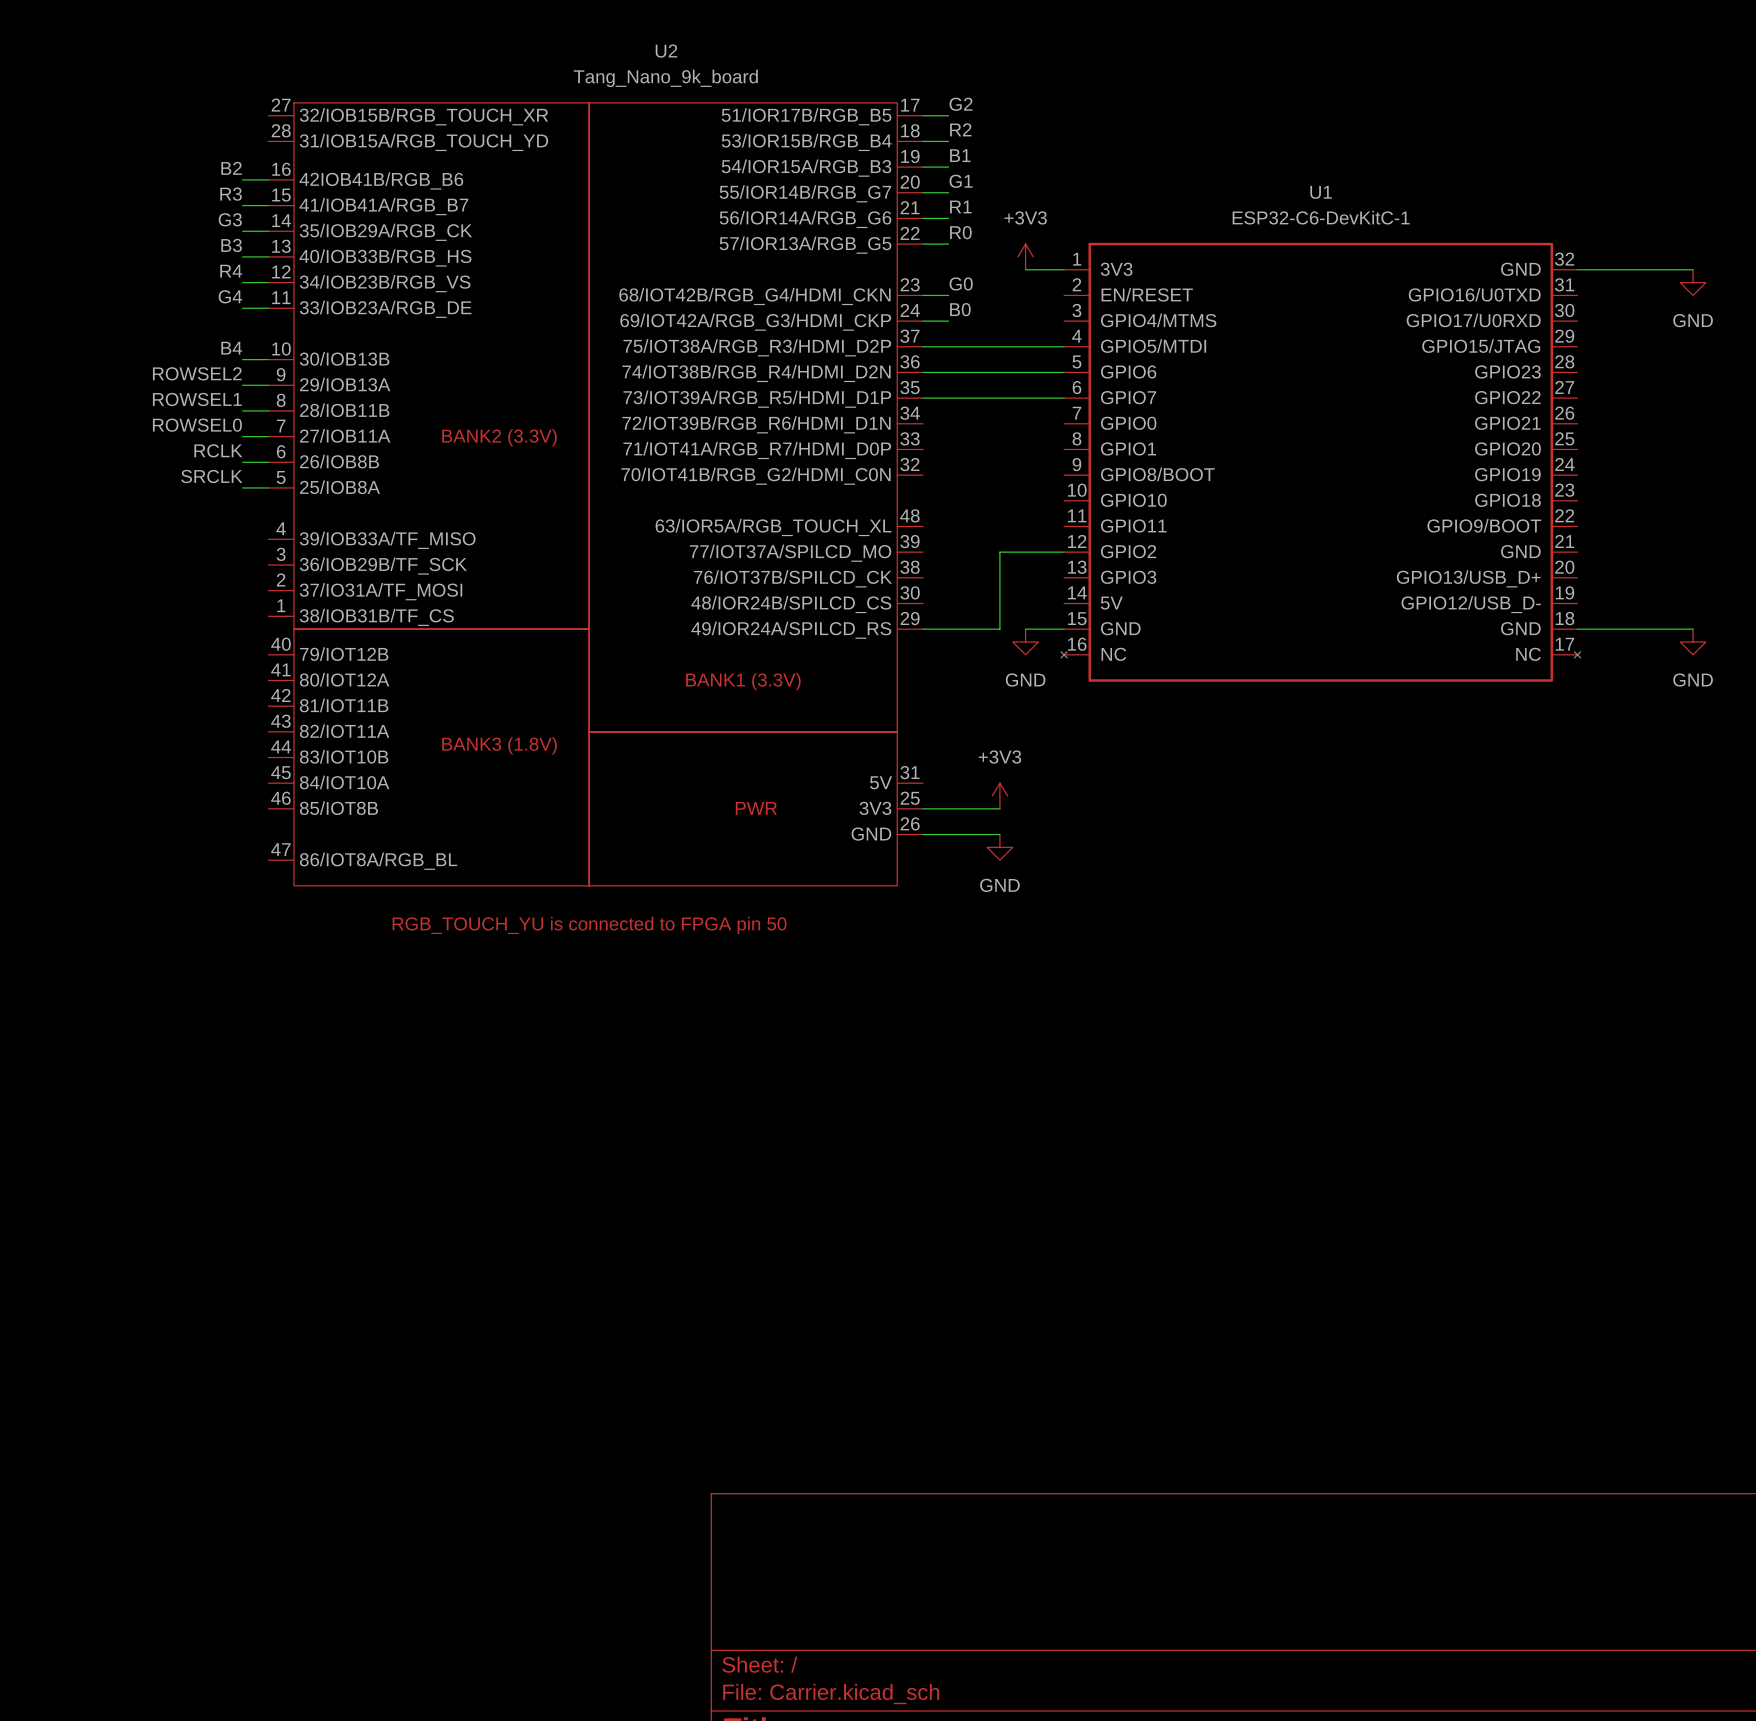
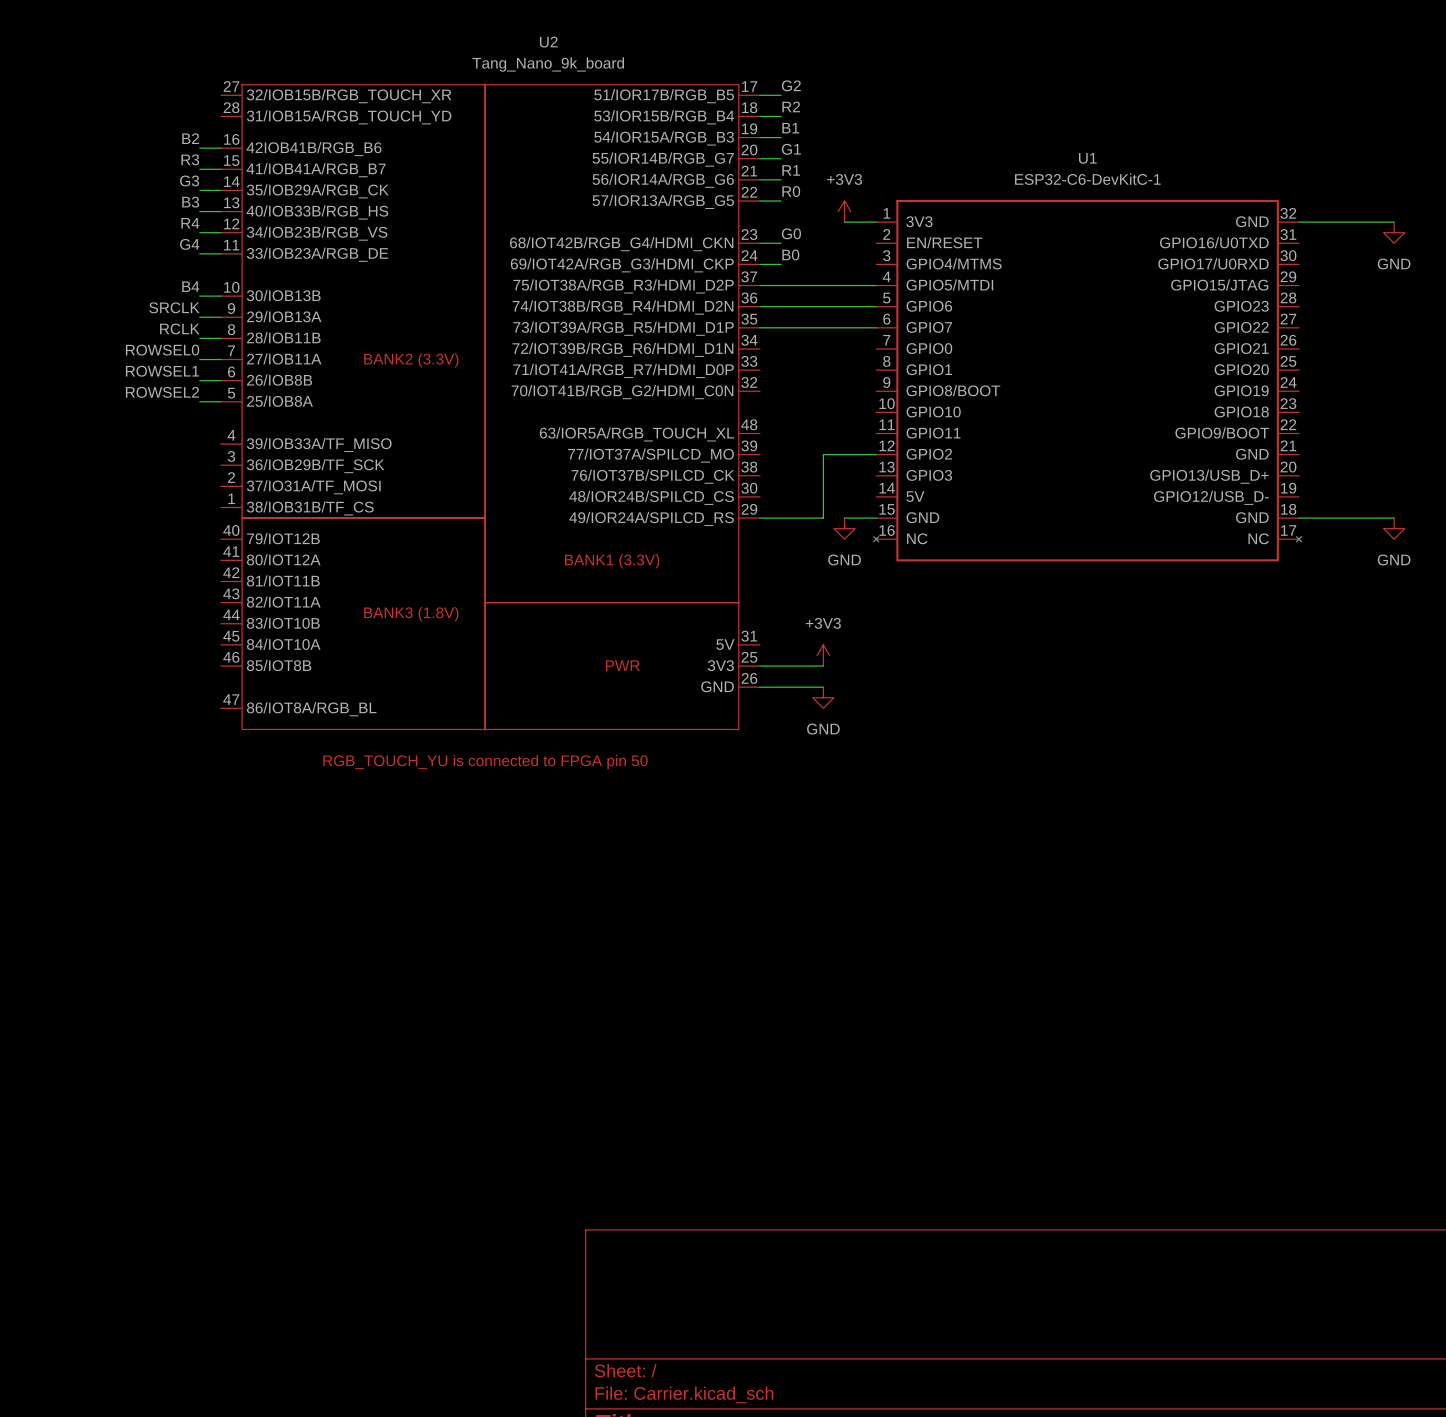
label: ROWSEL2 (197, 373) -> SRCLK (174, 307)
label: ROWSEL1 (197, 399) -> RCLK (179, 328)
label: RCLK (218, 450) -> ROWSEL1 (162, 371)
label: SRCLK (211, 476) -> ROWSEL2 (162, 392)

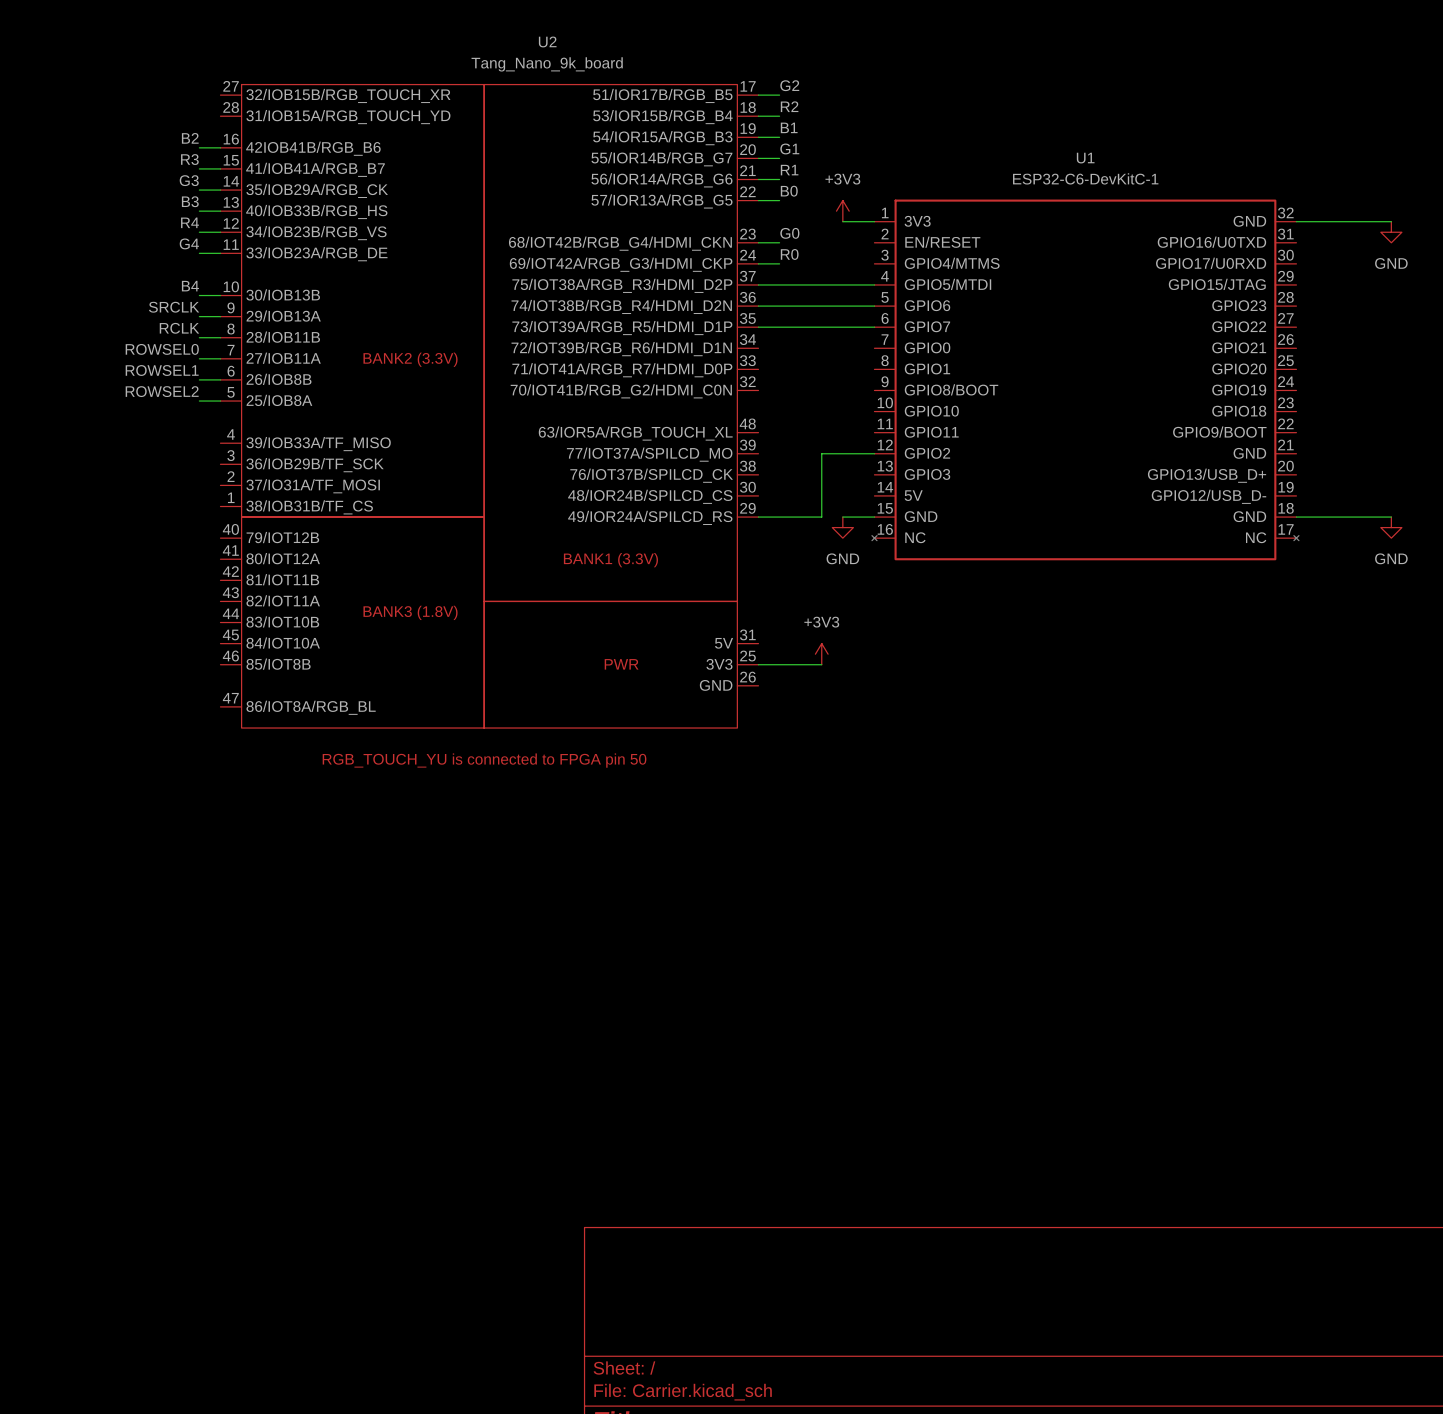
label: R0 (791, 191) -> B0 (789, 191)
label: B0 (790, 254) -> R0 (789, 254)
wire: (759, 687) (823, 687) -> none
power symbol: GND (823, 697) -> none

